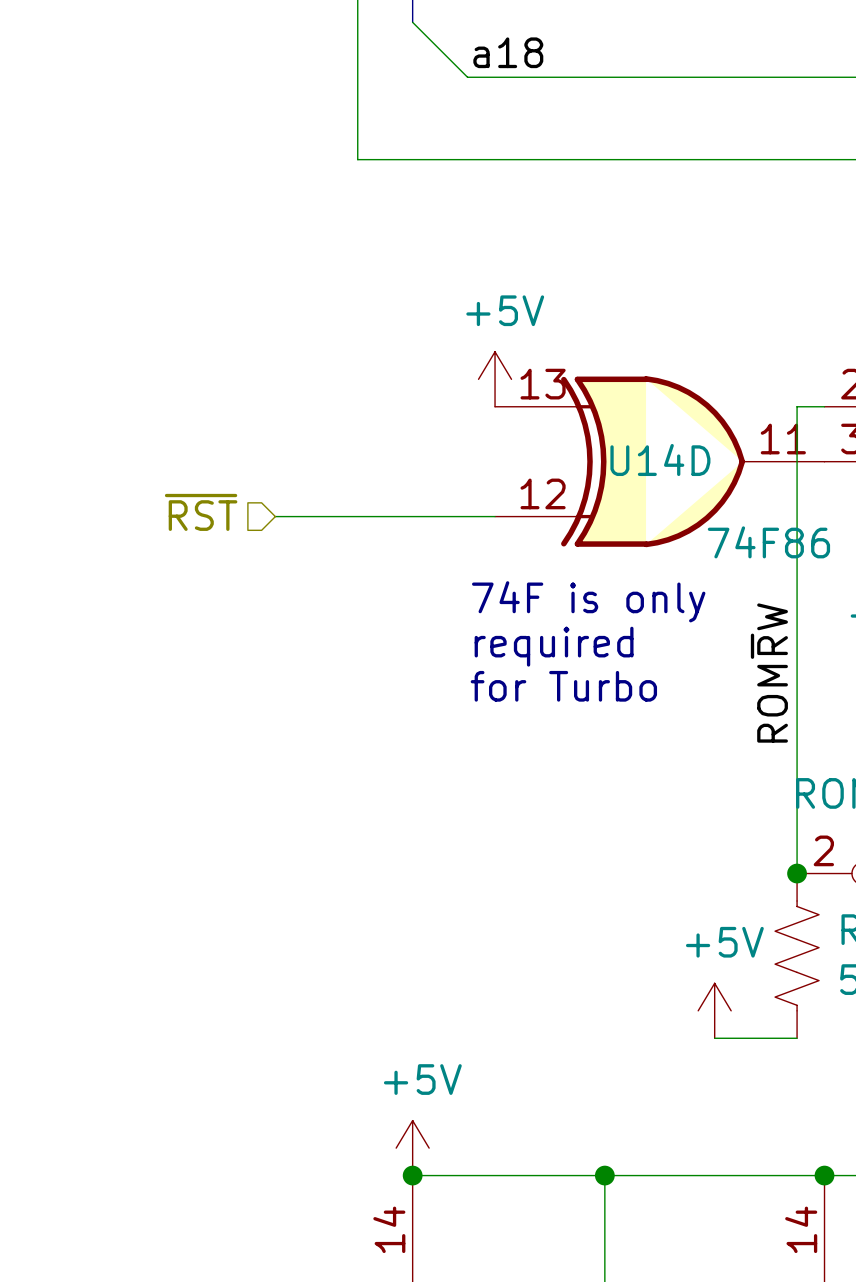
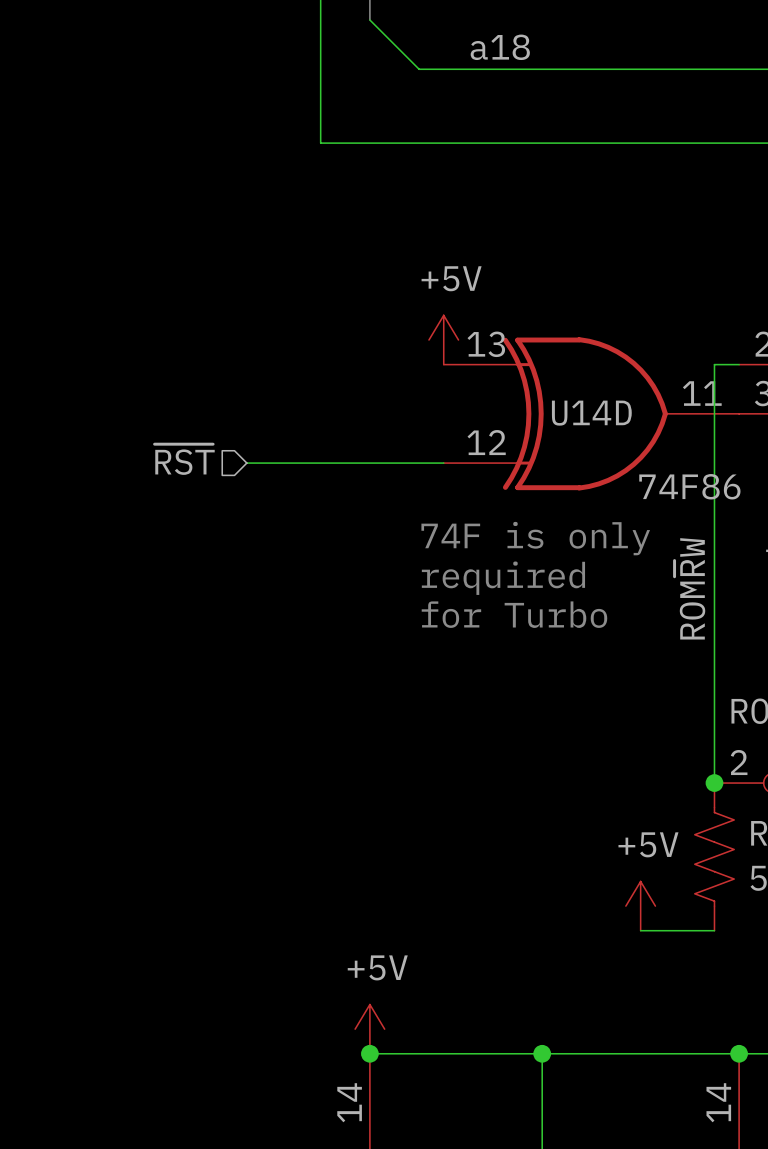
label position: a18 (508, 52) -> a18 (500, 47)

